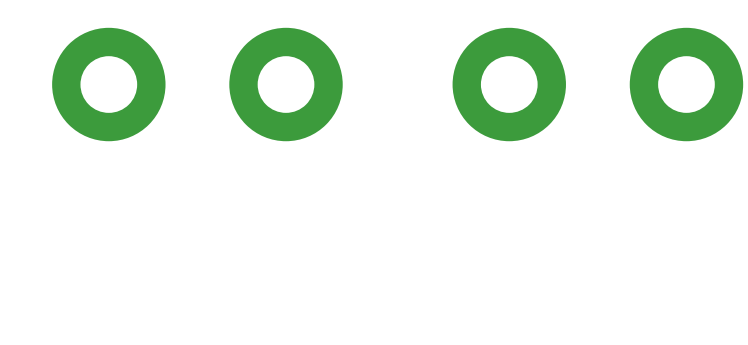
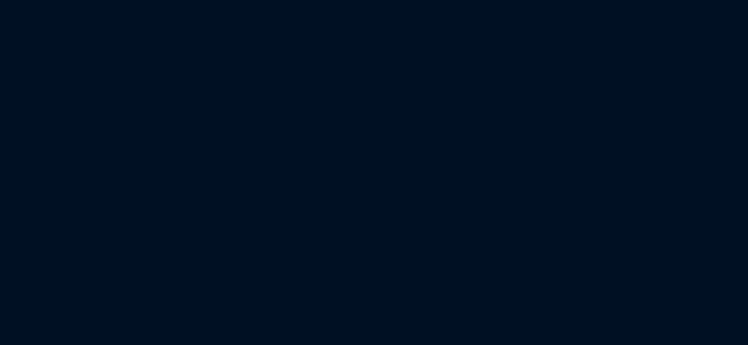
part: (197, 84) -> none
part: (597, 84) -> none

